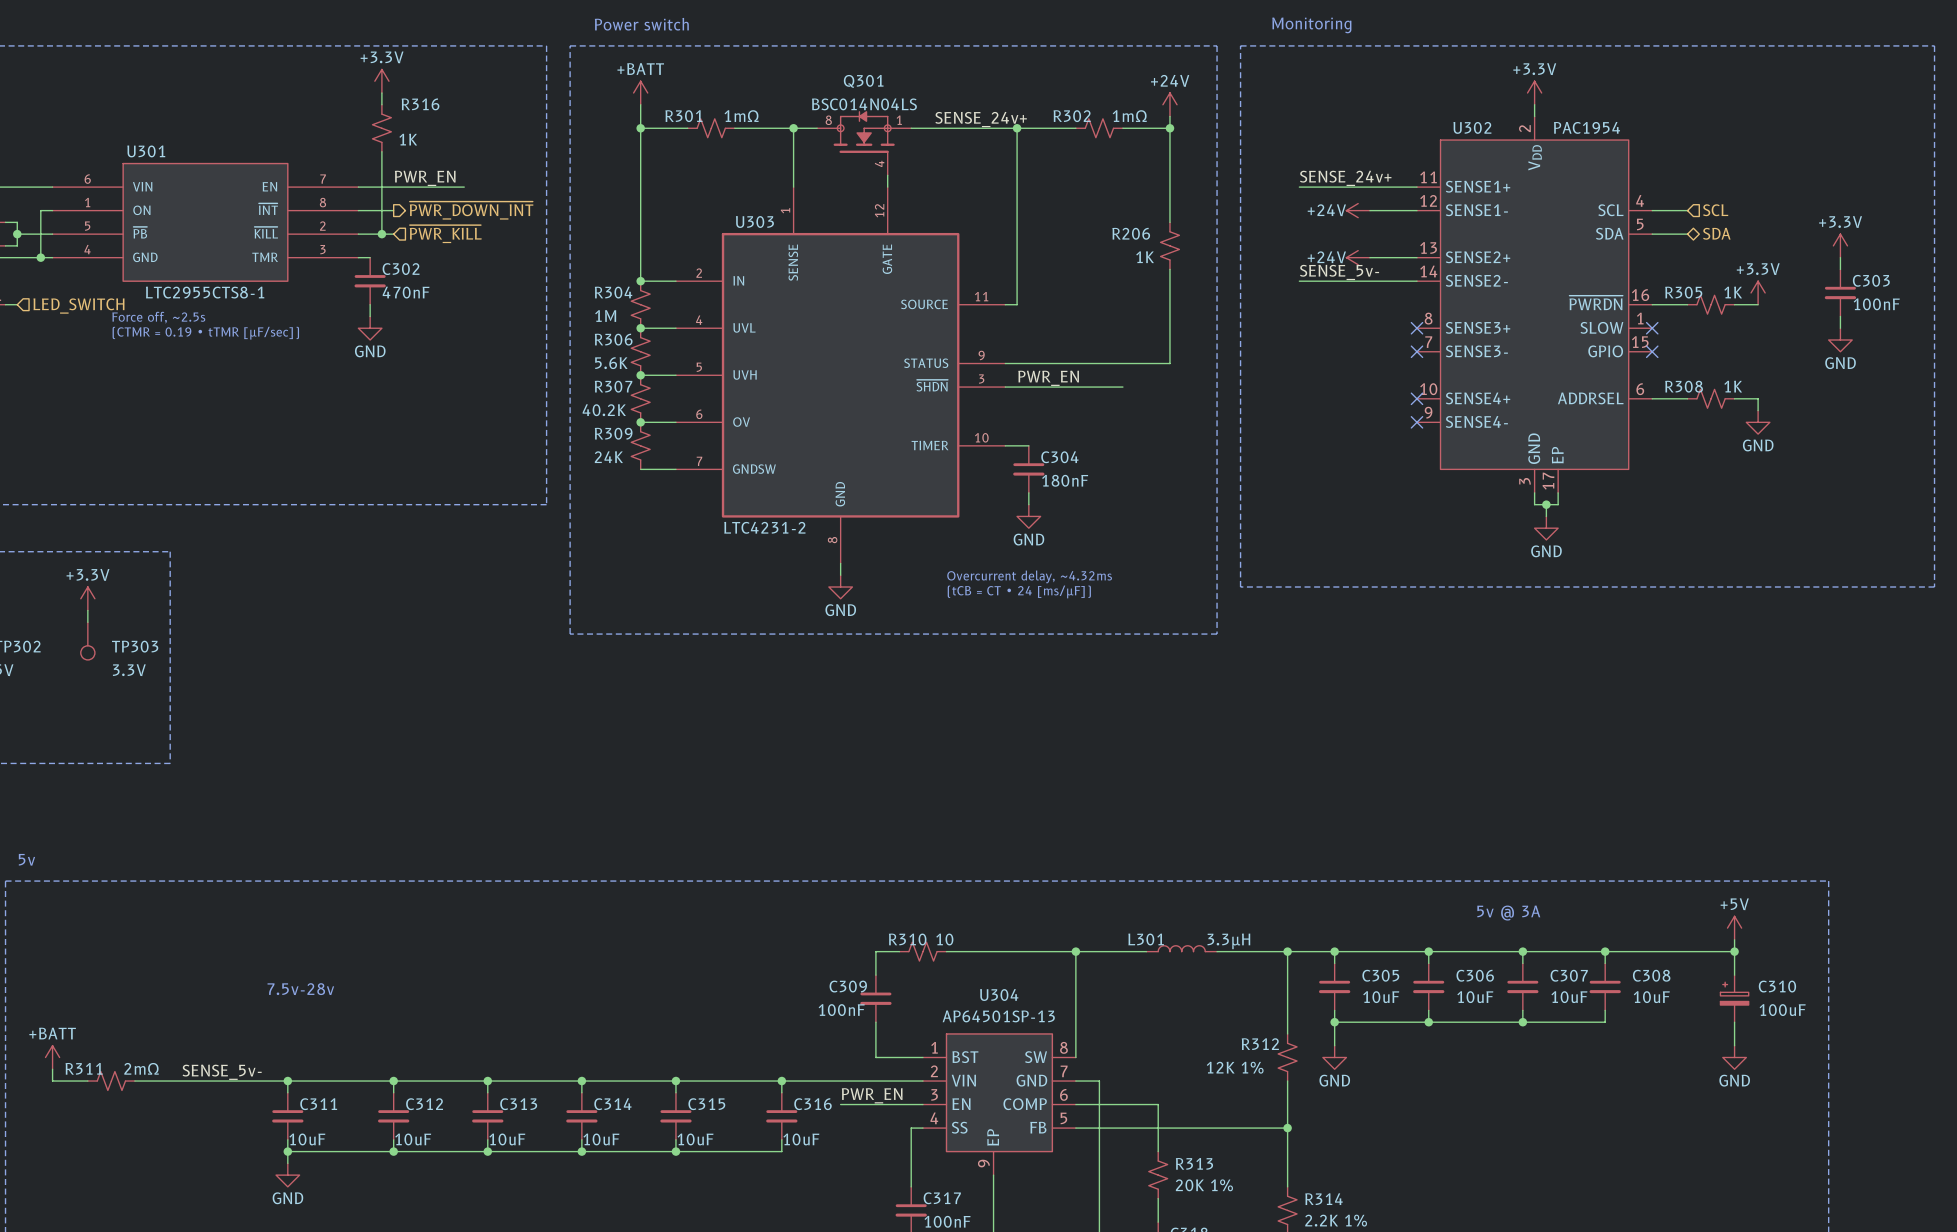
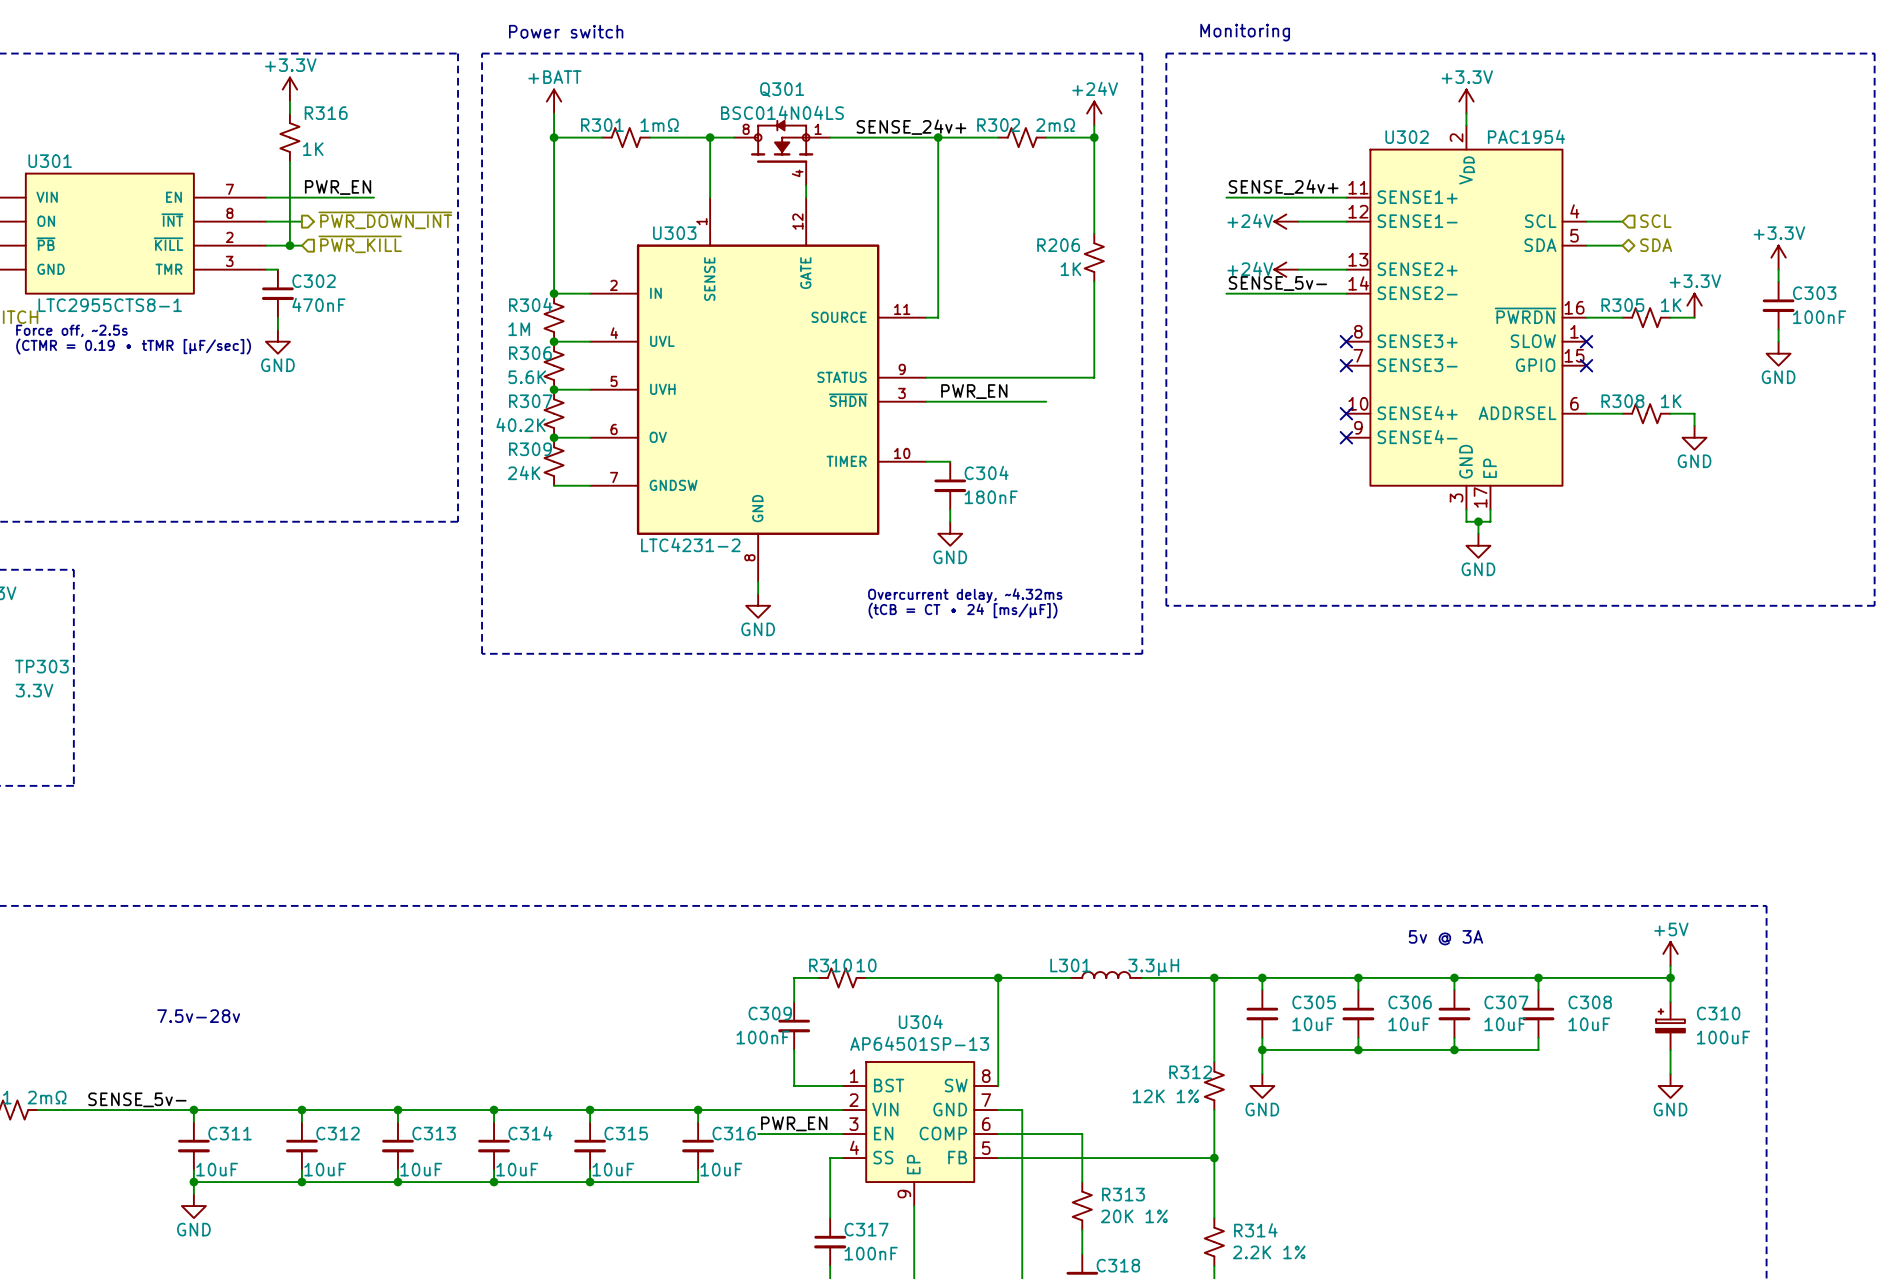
R302 value: 1mΩ (1129, 116) -> 2mΩ (1055, 125)

